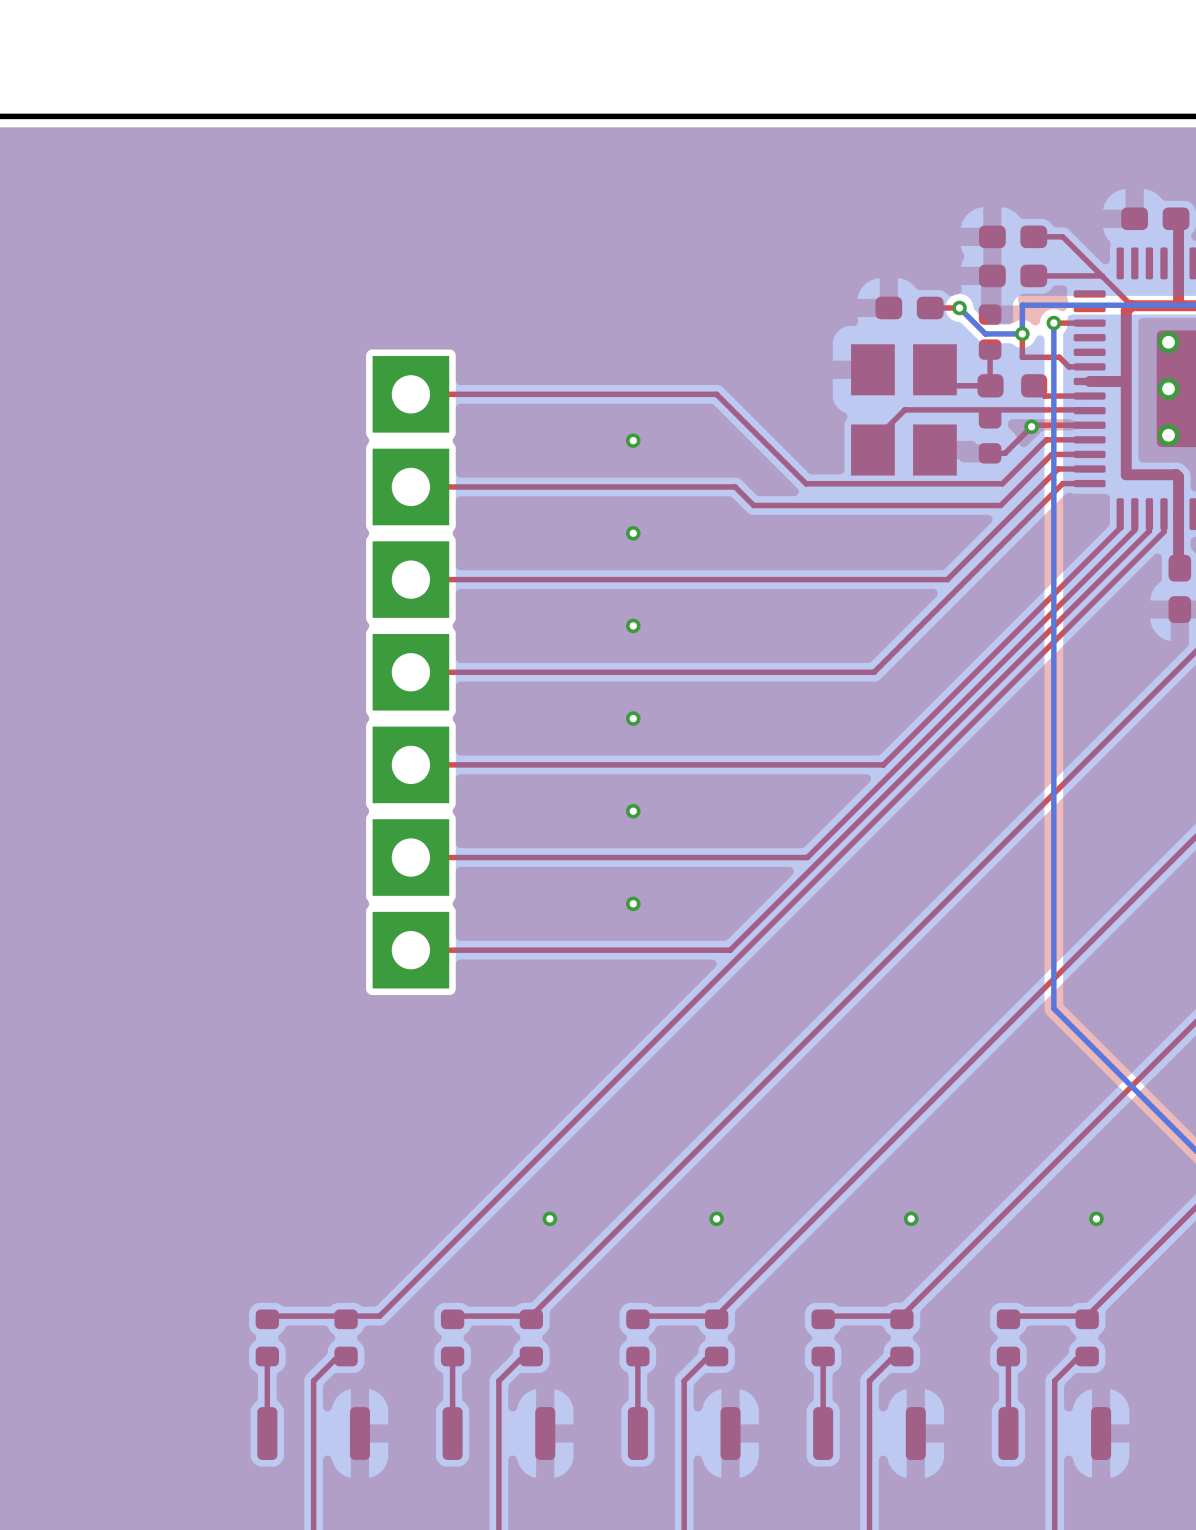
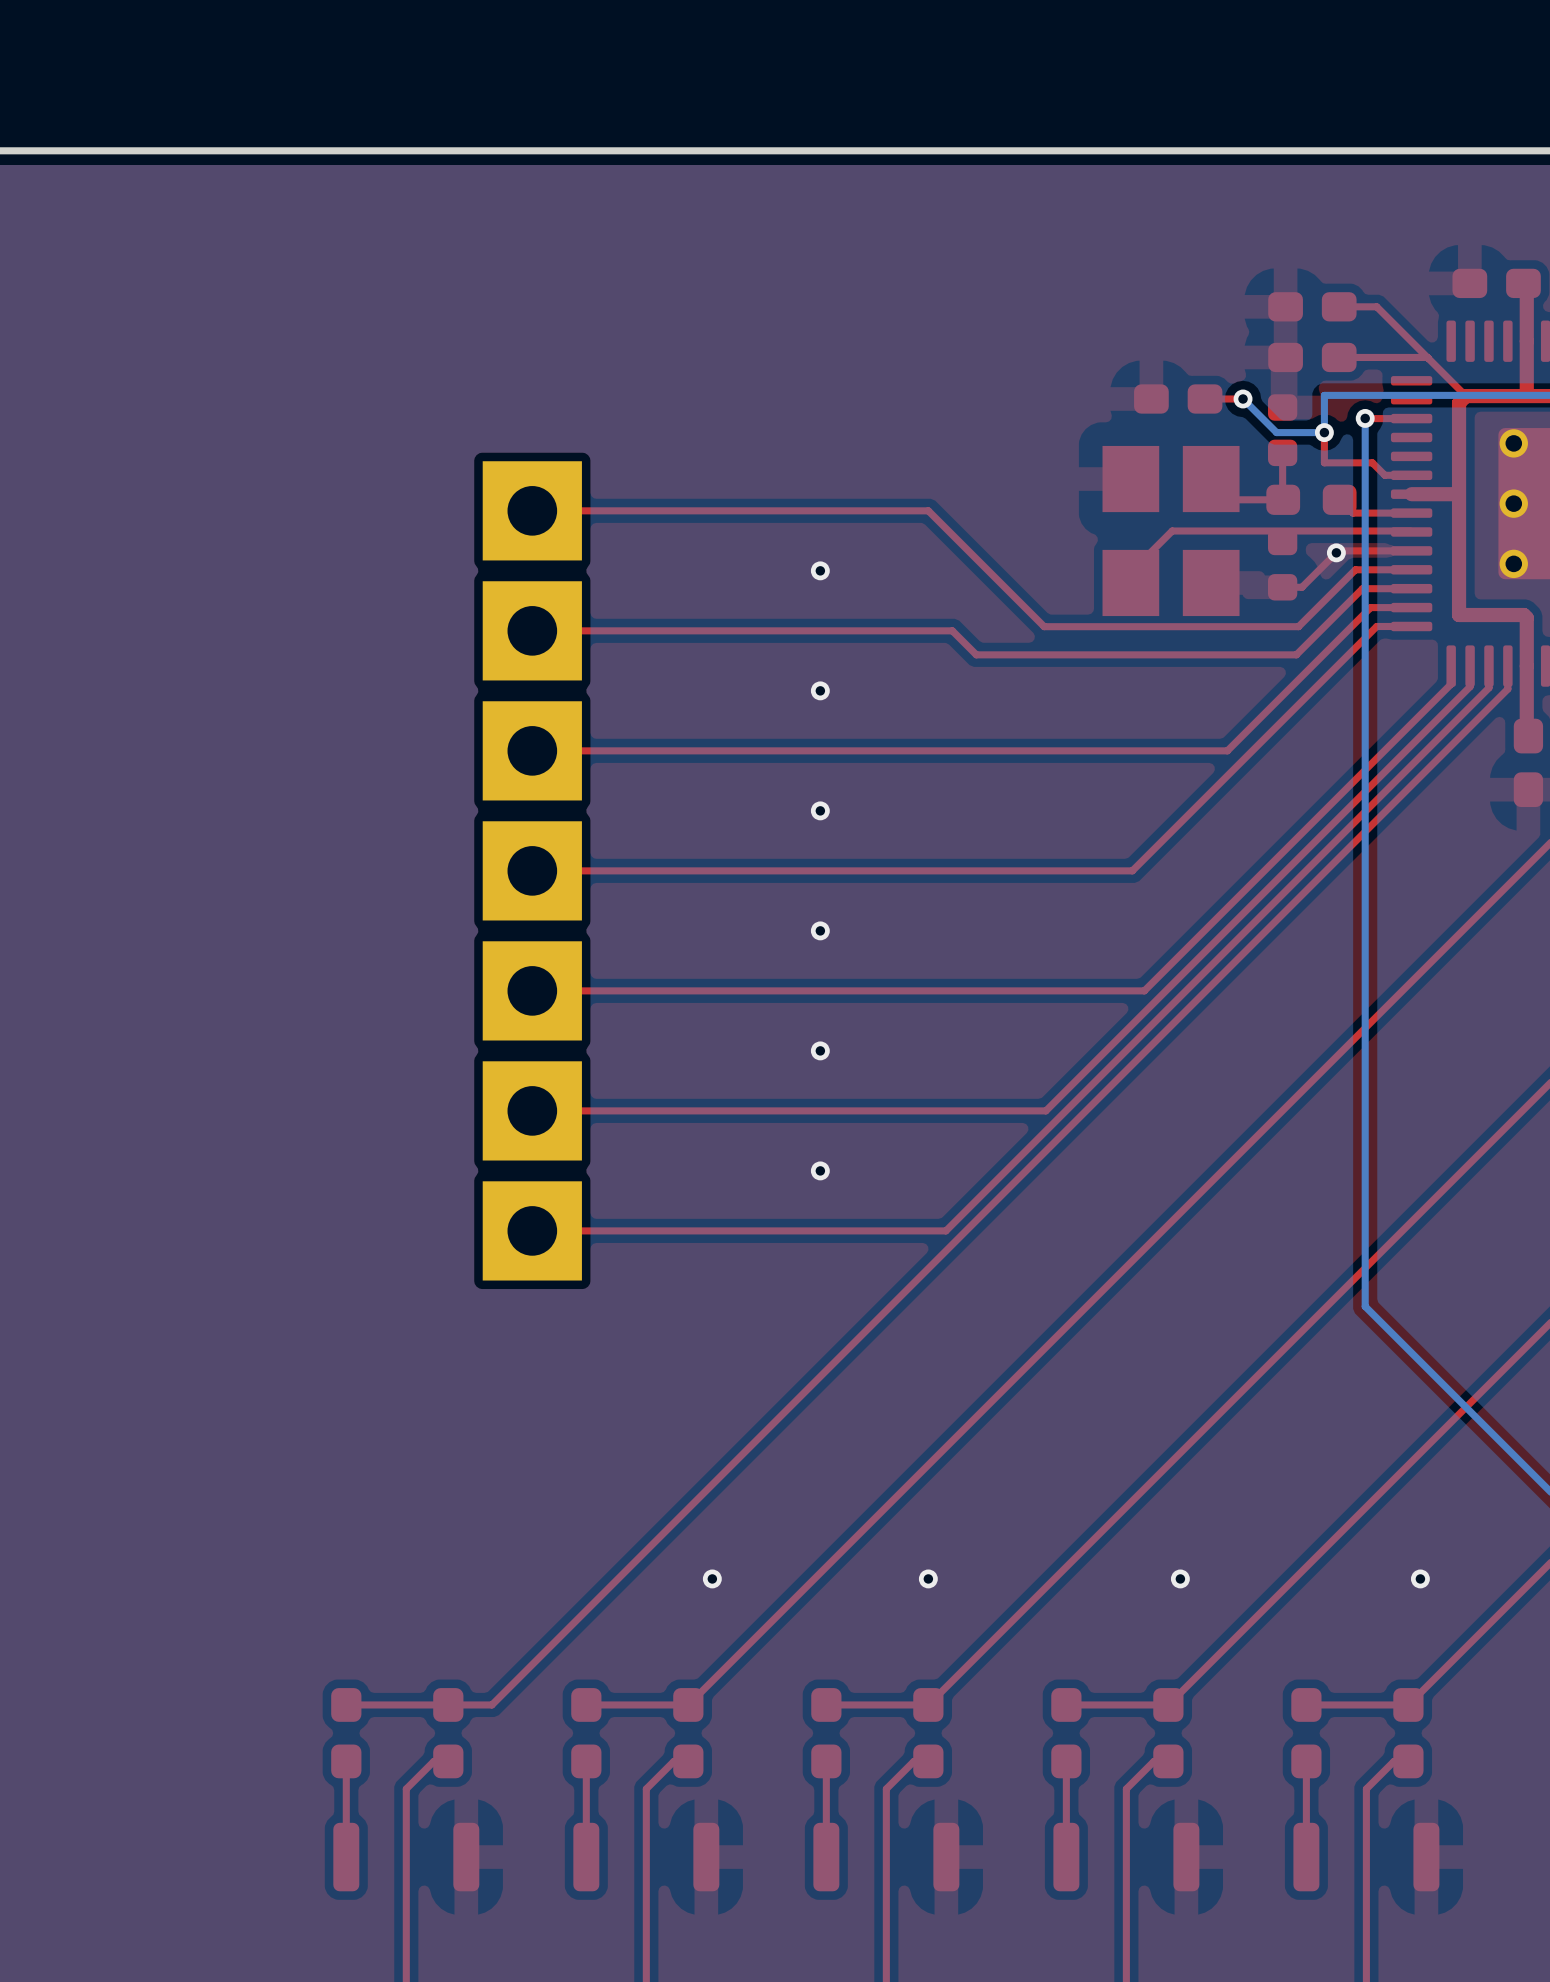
part footprint: [255, 1309, 279, 1367] -> [331, 1688, 362, 1779]
part footprint: [334, 1309, 358, 1367] -> [433, 1688, 464, 1779]
part footprint: [440, 1309, 465, 1367] -> [571, 1688, 602, 1779]
part footprint: [519, 1309, 544, 1367] -> [673, 1688, 704, 1779]
part footprint: [626, 1309, 650, 1367] -> [811, 1688, 842, 1779]
part footprint: [704, 1309, 729, 1367] -> [913, 1688, 944, 1779]
part footprint: [811, 1309, 835, 1367] -> [1051, 1688, 1082, 1779]
part footprint: [890, 1309, 914, 1367] -> [1153, 1688, 1184, 1779]
part footprint: [996, 1309, 1021, 1367] -> [1291, 1688, 1322, 1779]
part footprint: [1075, 1309, 1099, 1367] -> [1393, 1688, 1424, 1779]

